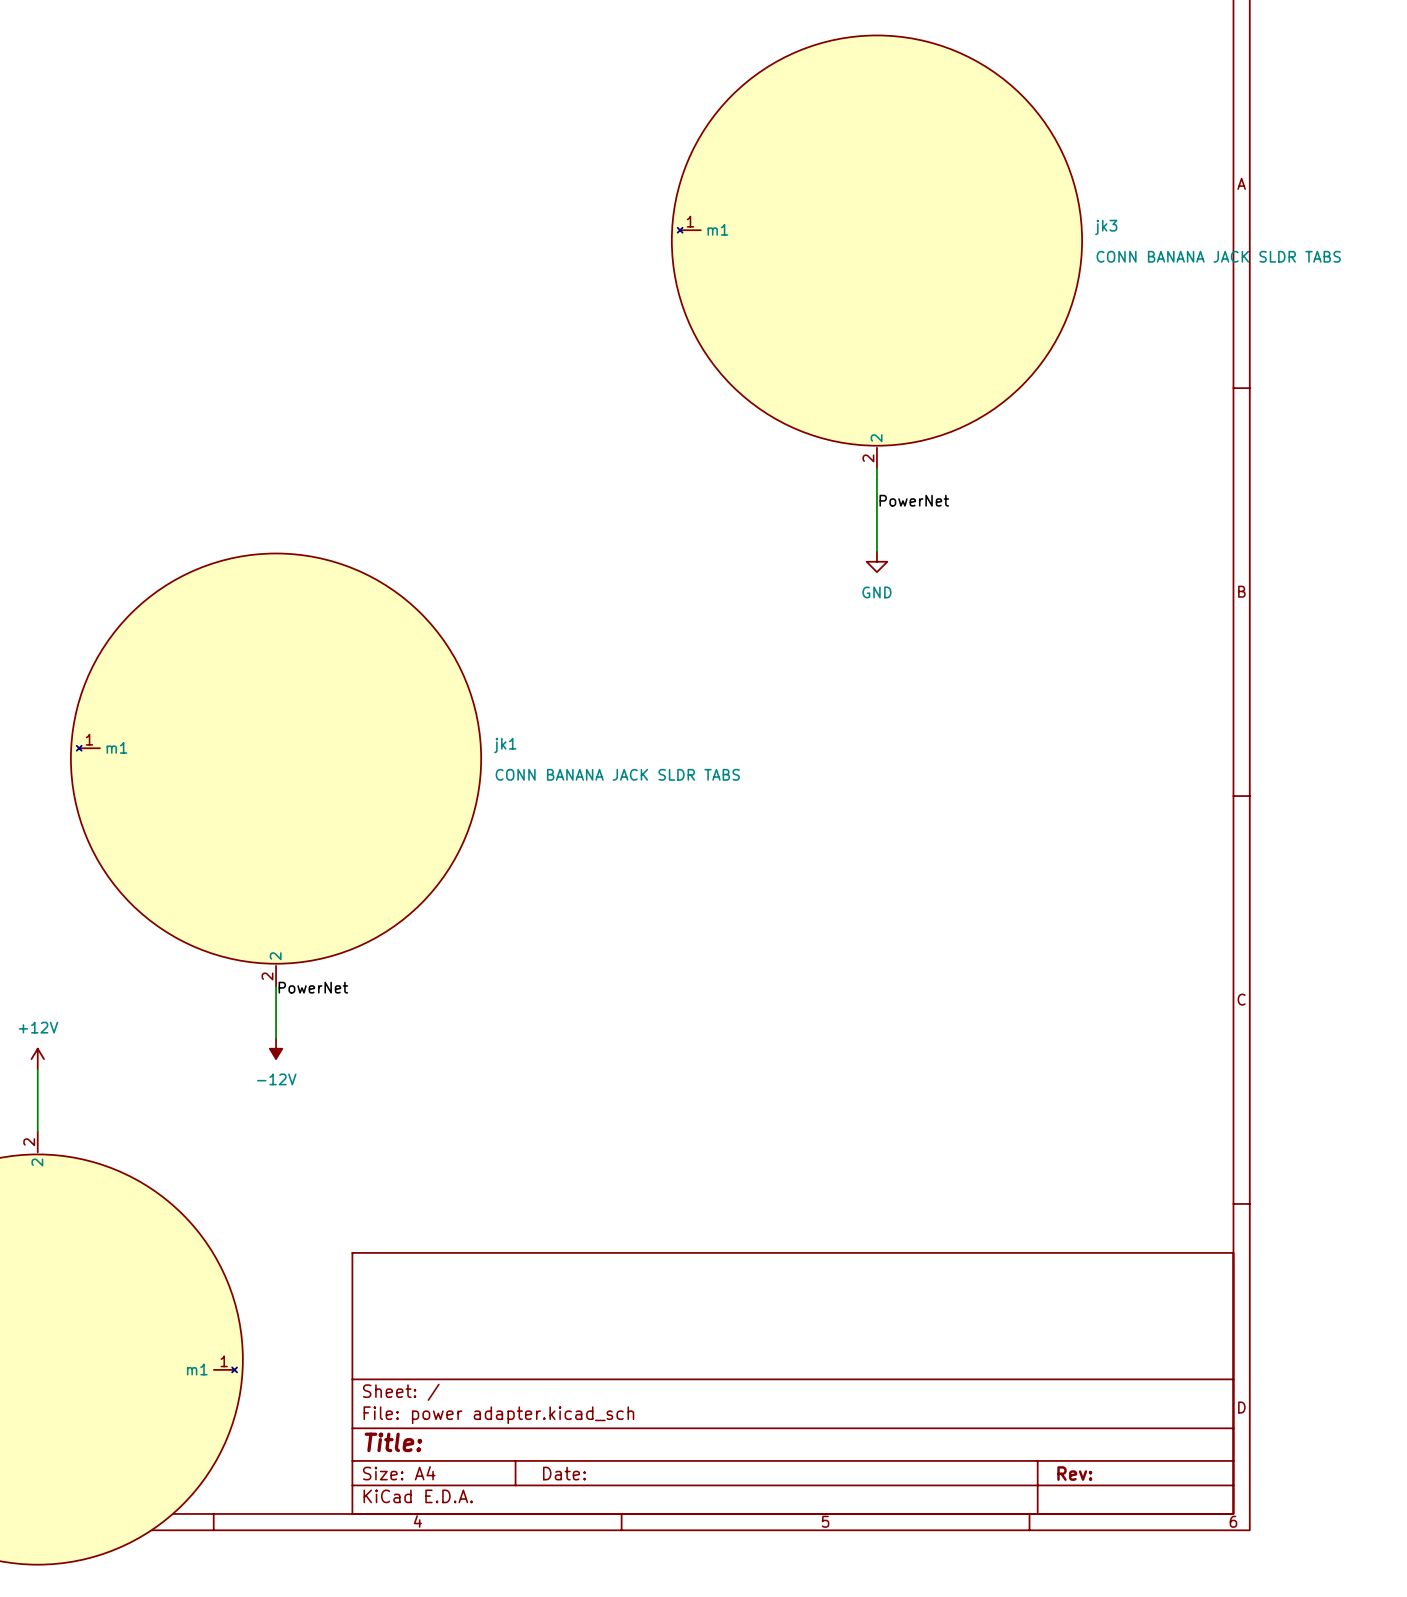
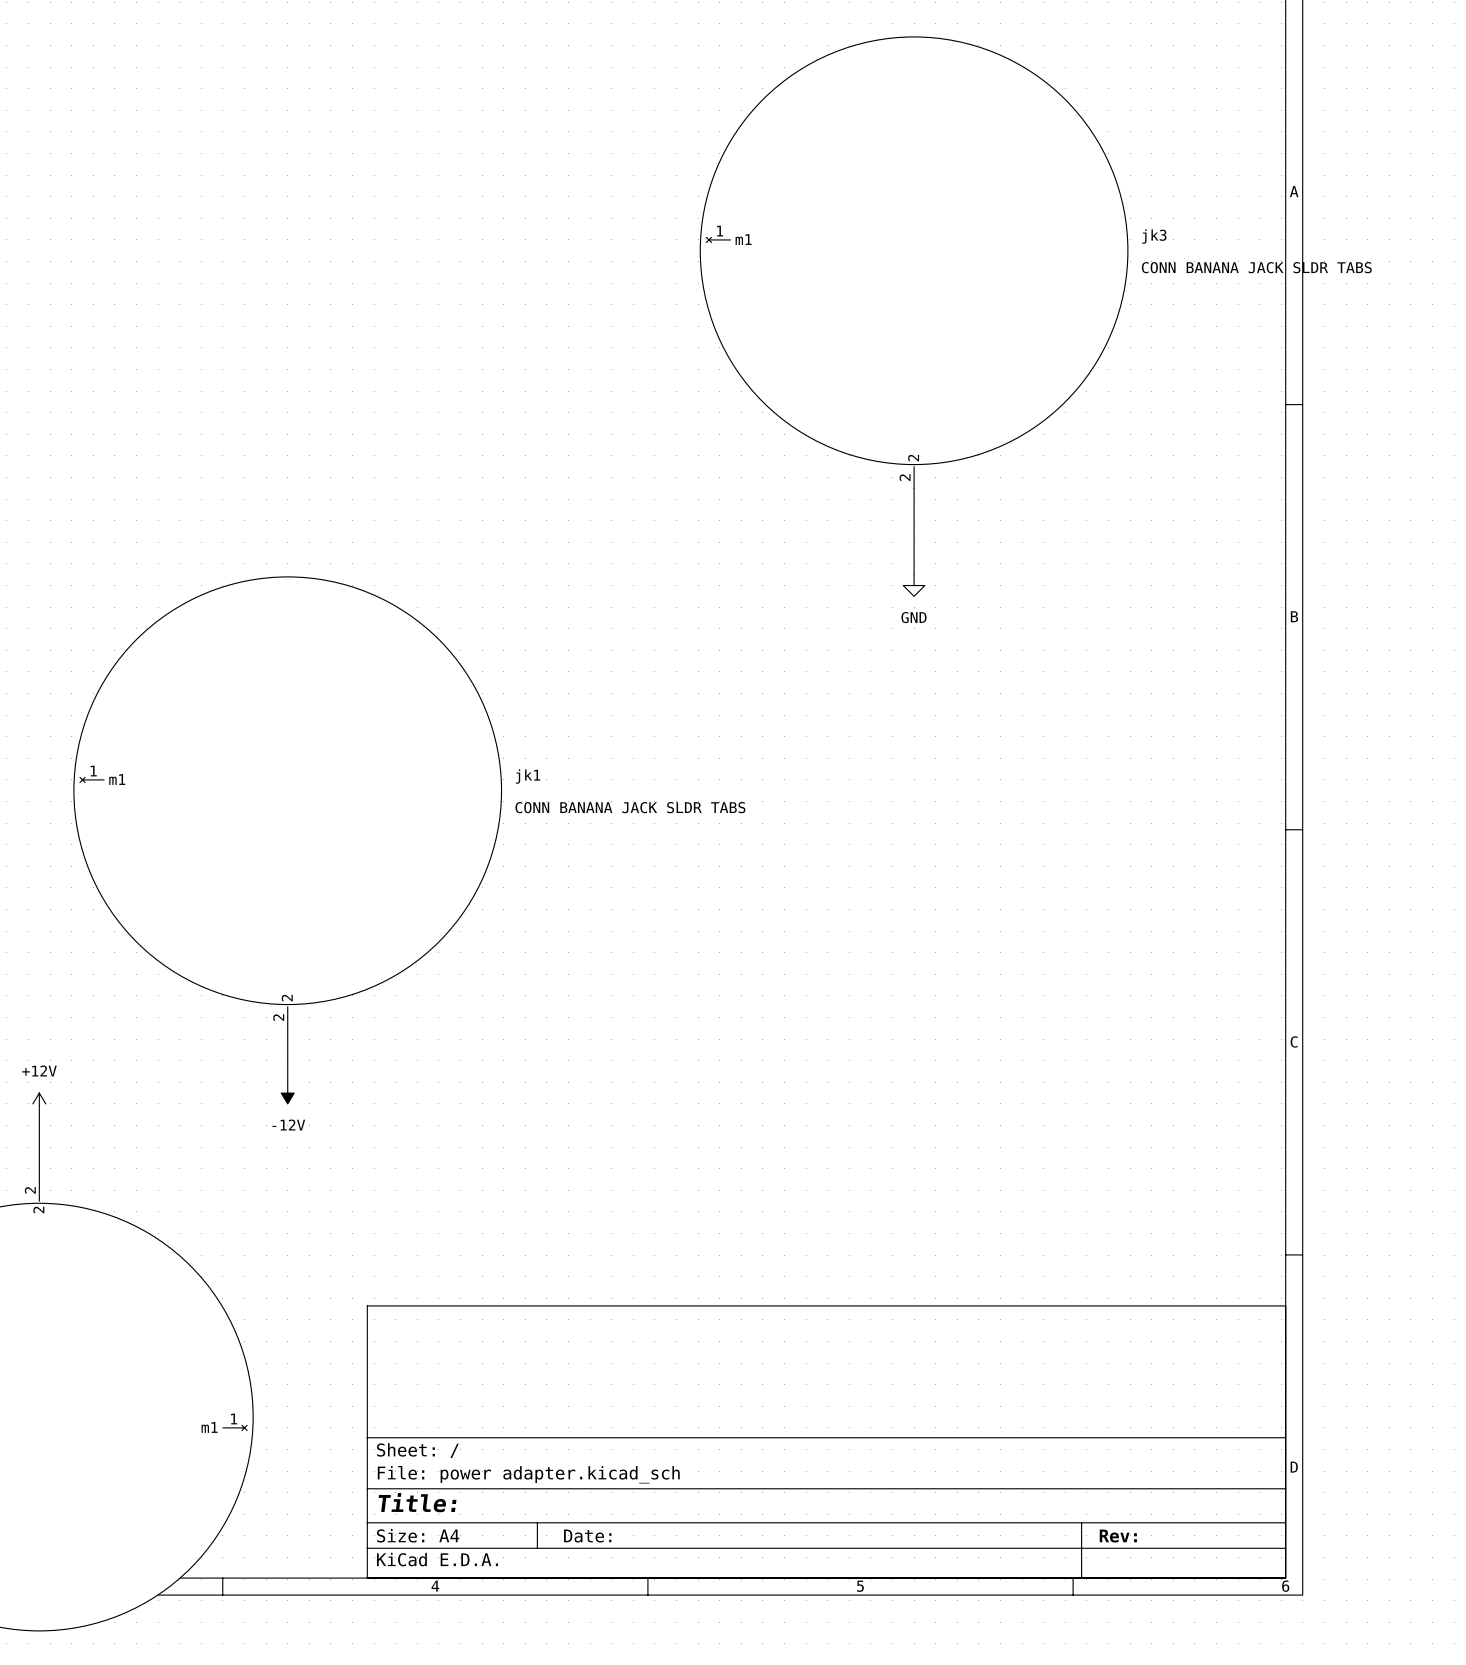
label: PowerNet (914, 500) -> none
label: PowerNet (313, 987) -> none

